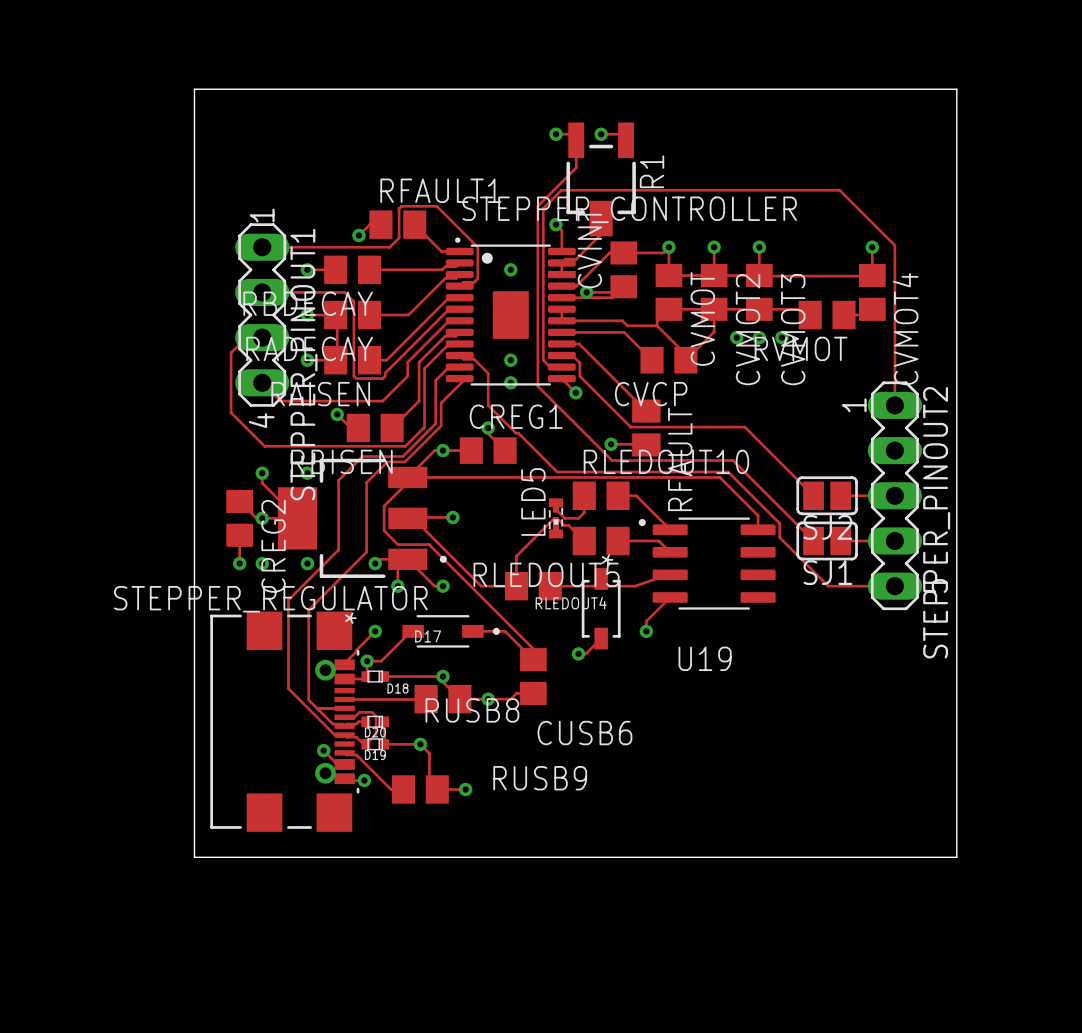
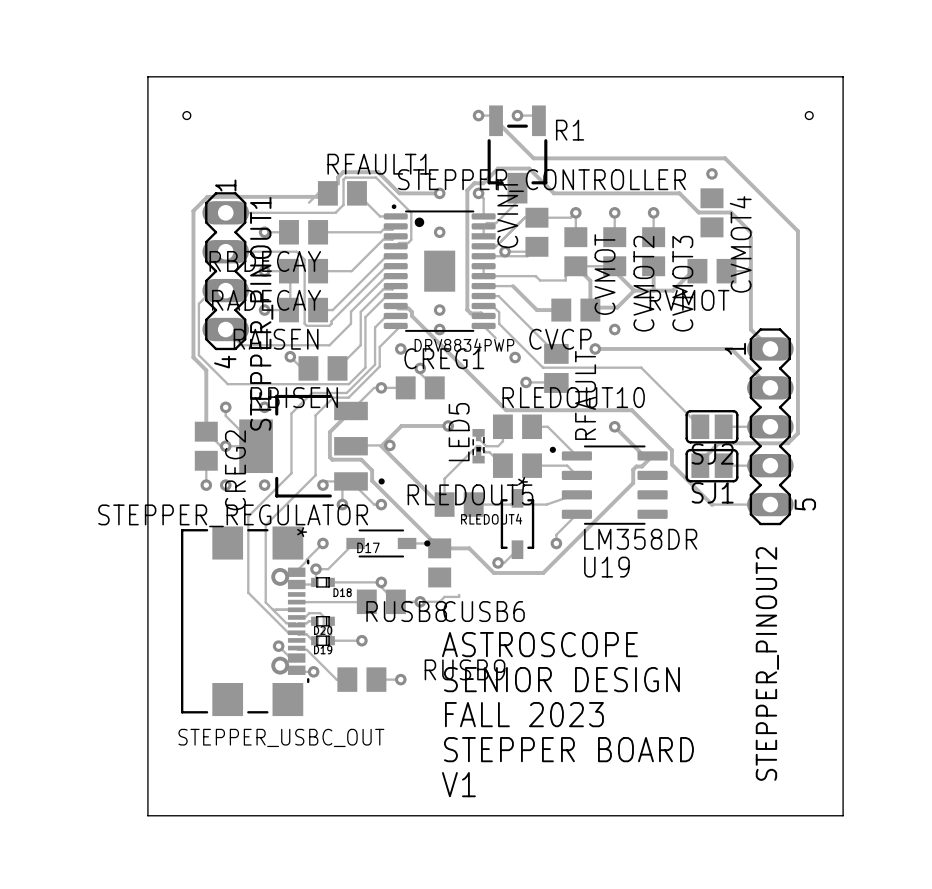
board edge: (194, 89) (194, 857) (956, 857) (956, 89) -> (167, 76) (147, 76) (147, 815) (843, 815) (843, 76) (823, 76)
hole: none -> (186, 115)
hole: none -> (809, 115)
track: (576, 140) (576, 167) (537, 206) (537, 386) (612, 460) (733, 460) (813, 540) -> (496, 120) (533, 158) (725, 158) (797, 231) (797, 433) (788, 443) (718, 443) (700, 461) (700, 465)
R1 name rotation: 0° (652, 171) -> 90° clockwise (570, 130)
track: none -> (439, 193) (399, 193) (378, 172) (343, 172) (338, 177) (338, 183) (324, 196) (207, 196) (193, 210) (193, 357) (206, 370) (206, 431)
via: none -> (439, 193)
via: (358, 235) -> none
track: (872, 247) (872, 269) -> none
via position: (872, 247) -> (711, 173)
track: (668, 275) (872, 275) -> (770, 348) (750, 329) (750, 237)
CVMOT4 position: (872, 292) -> (711, 212)
track: none -> (575, 266) (590, 280) (590, 310)
track: (714, 309) (804, 309) -> none
track: none -> (653, 266) (653, 290)
track: (714, 315) (714, 331) (688, 357) (657, 325) -> (614, 271) (634, 290)
track: none -> (697, 271) (692, 271) (673, 290) (634, 290)
track: (595, 332) (624, 332) (652, 360) -> (512, 286) (536, 310) (561, 310)
track: none -> (634, 290) (617, 307) (592, 307)
via: (736, 337) -> none
via: (759, 337) -> none
via: (781, 337) -> none
track: (462, 358) (474, 359) (488, 373) (488, 405) (557, 472) (728, 472) (779, 523) (779, 537) (828, 586) -> (398, 308) (408, 308) (412, 312) (412, 316) (506, 410) (631, 410) (671, 450) (671, 464) (712, 504)
track: (561, 367) (548, 365) (543, 360) (543, 208) (561, 190) (839, 190) (894, 245) (894, 405) -> (483, 315) (481, 313) (470, 313) (467, 309) (467, 190) (474, 183) (483, 183) (498, 168) (529, 168) (554, 193) (679, 193) (698, 212) (731, 212) (750, 232)
via: none -> (614, 329)
via position: (575, 392) -> (515, 357)
STEPPER_CONTROLLER value: none -> DRV8834PWP (464, 345)
via: none -> (400, 348)
track: none -> (595, 348) (731, 348) (770, 387)
via: none -> (595, 348)
track: none -> (351, 410) (329, 432) (329, 457) (332, 459) (361, 459) (372, 470) (372, 480) (434, 543)
via: none -> (448, 425)
via: none -> (614, 426)
track: (413, 518) (481, 586) (510, 586) -> (448, 425) (401, 425) (381, 446) (439, 504)
STEPPER_PINOUT2 name position: STEPPER_PINOUT2 (936, 522) -> STEPPER_PINOUT2 (767, 663)
track: (758, 529) (758, 515) (719, 477) (407, 477) (407, 482) (384, 506) (384, 530) (397, 544) (429, 544) (533, 648) (533, 659) (510, 637) -> (614, 426) (643, 455) (652, 455) (641, 466) (636, 466) (633, 469) (633, 483) (543, 572) (493, 572) (469, 548) (439, 548)
U19 value: none -> LM358DR (640, 539)
CUSB6 position: (533, 676) -> (439, 562)
track: (420, 744) (429, 753) (429, 788) -> none
text: none -> ASTROSCOPE (539, 644)
text: none -> SENIOR DESIGN (561, 679)
text: none -> FALL 2023 (524, 714)
STEPPER_USBC_OUT name: none -> STEPPER_USBC_OUT (281, 737)
text: none -> STEPPER BOARD (568, 749)
text: none -> V1 (458, 784)

